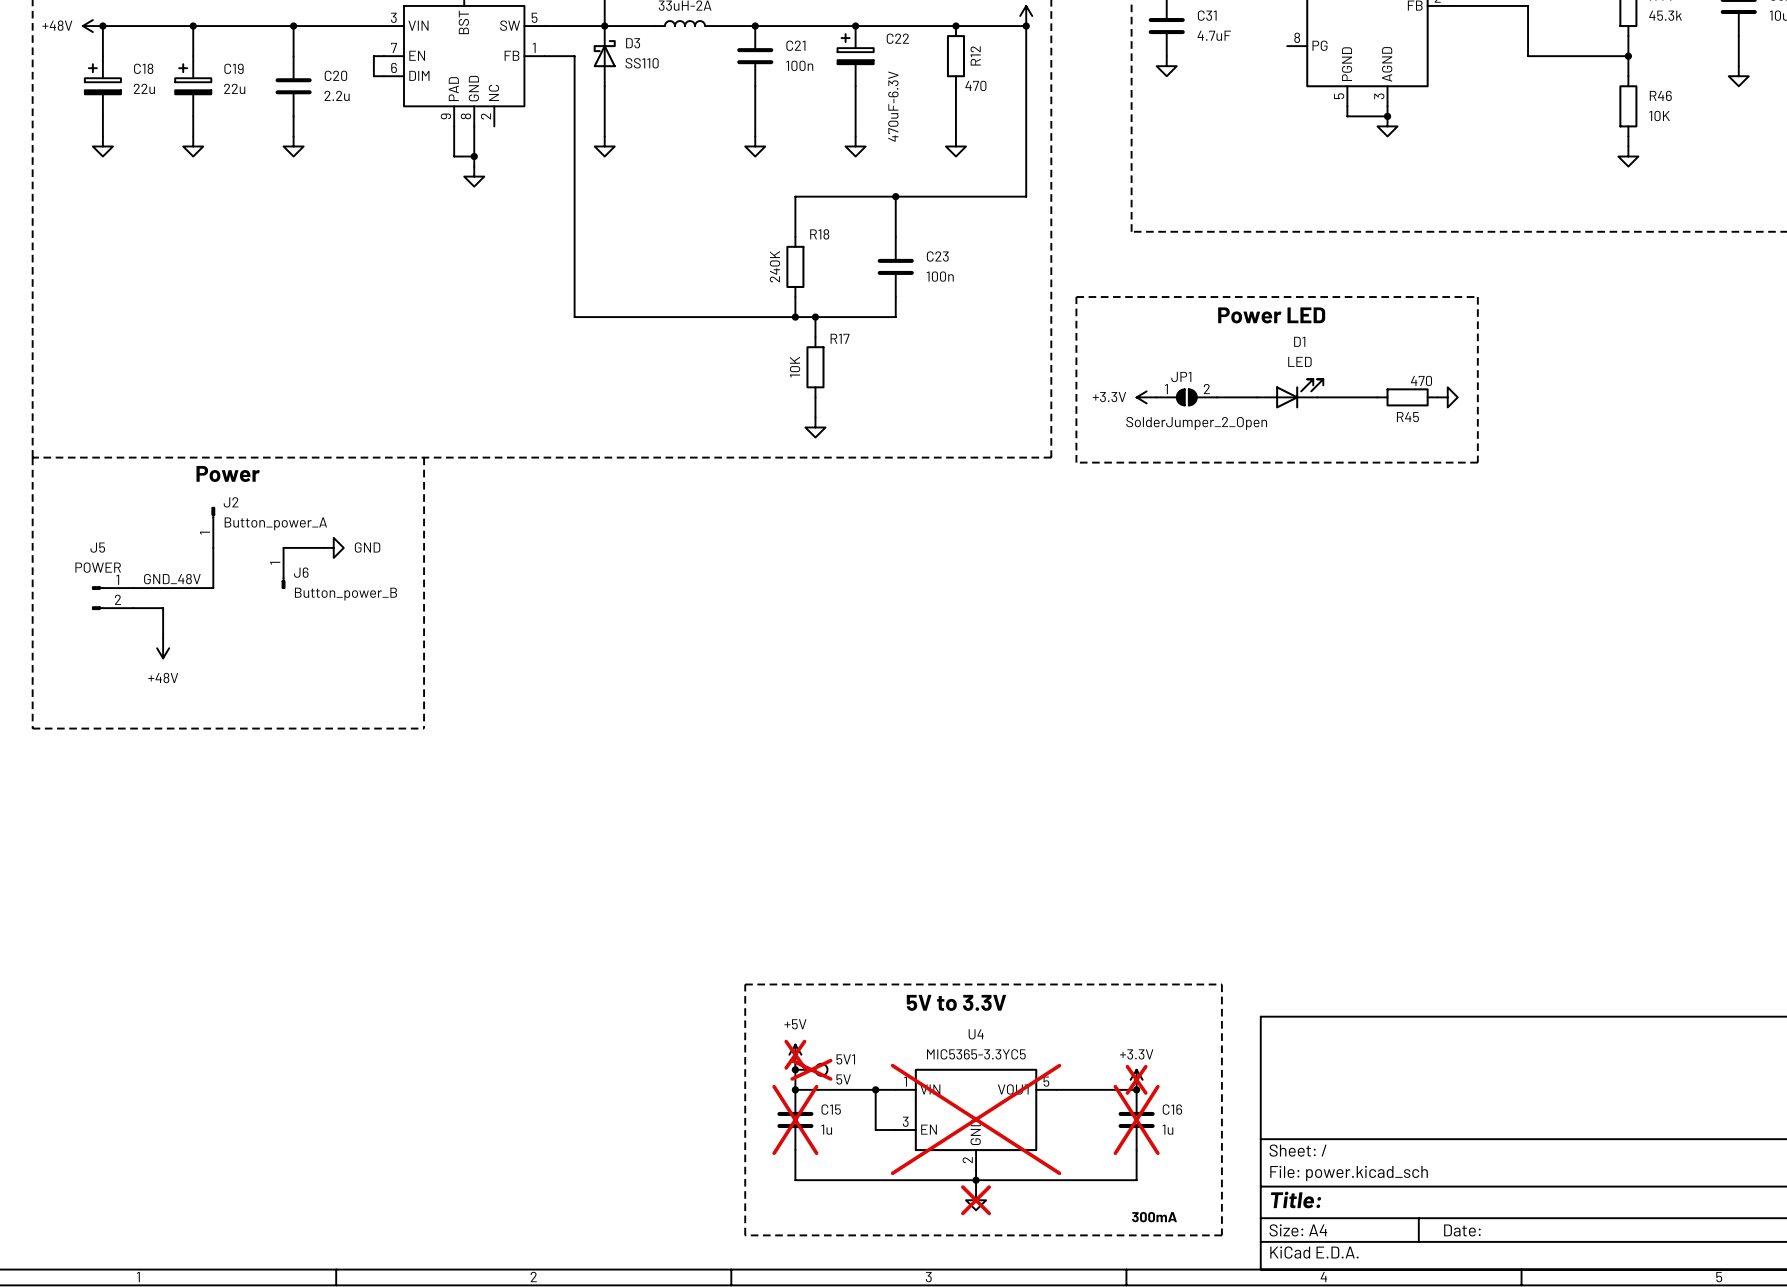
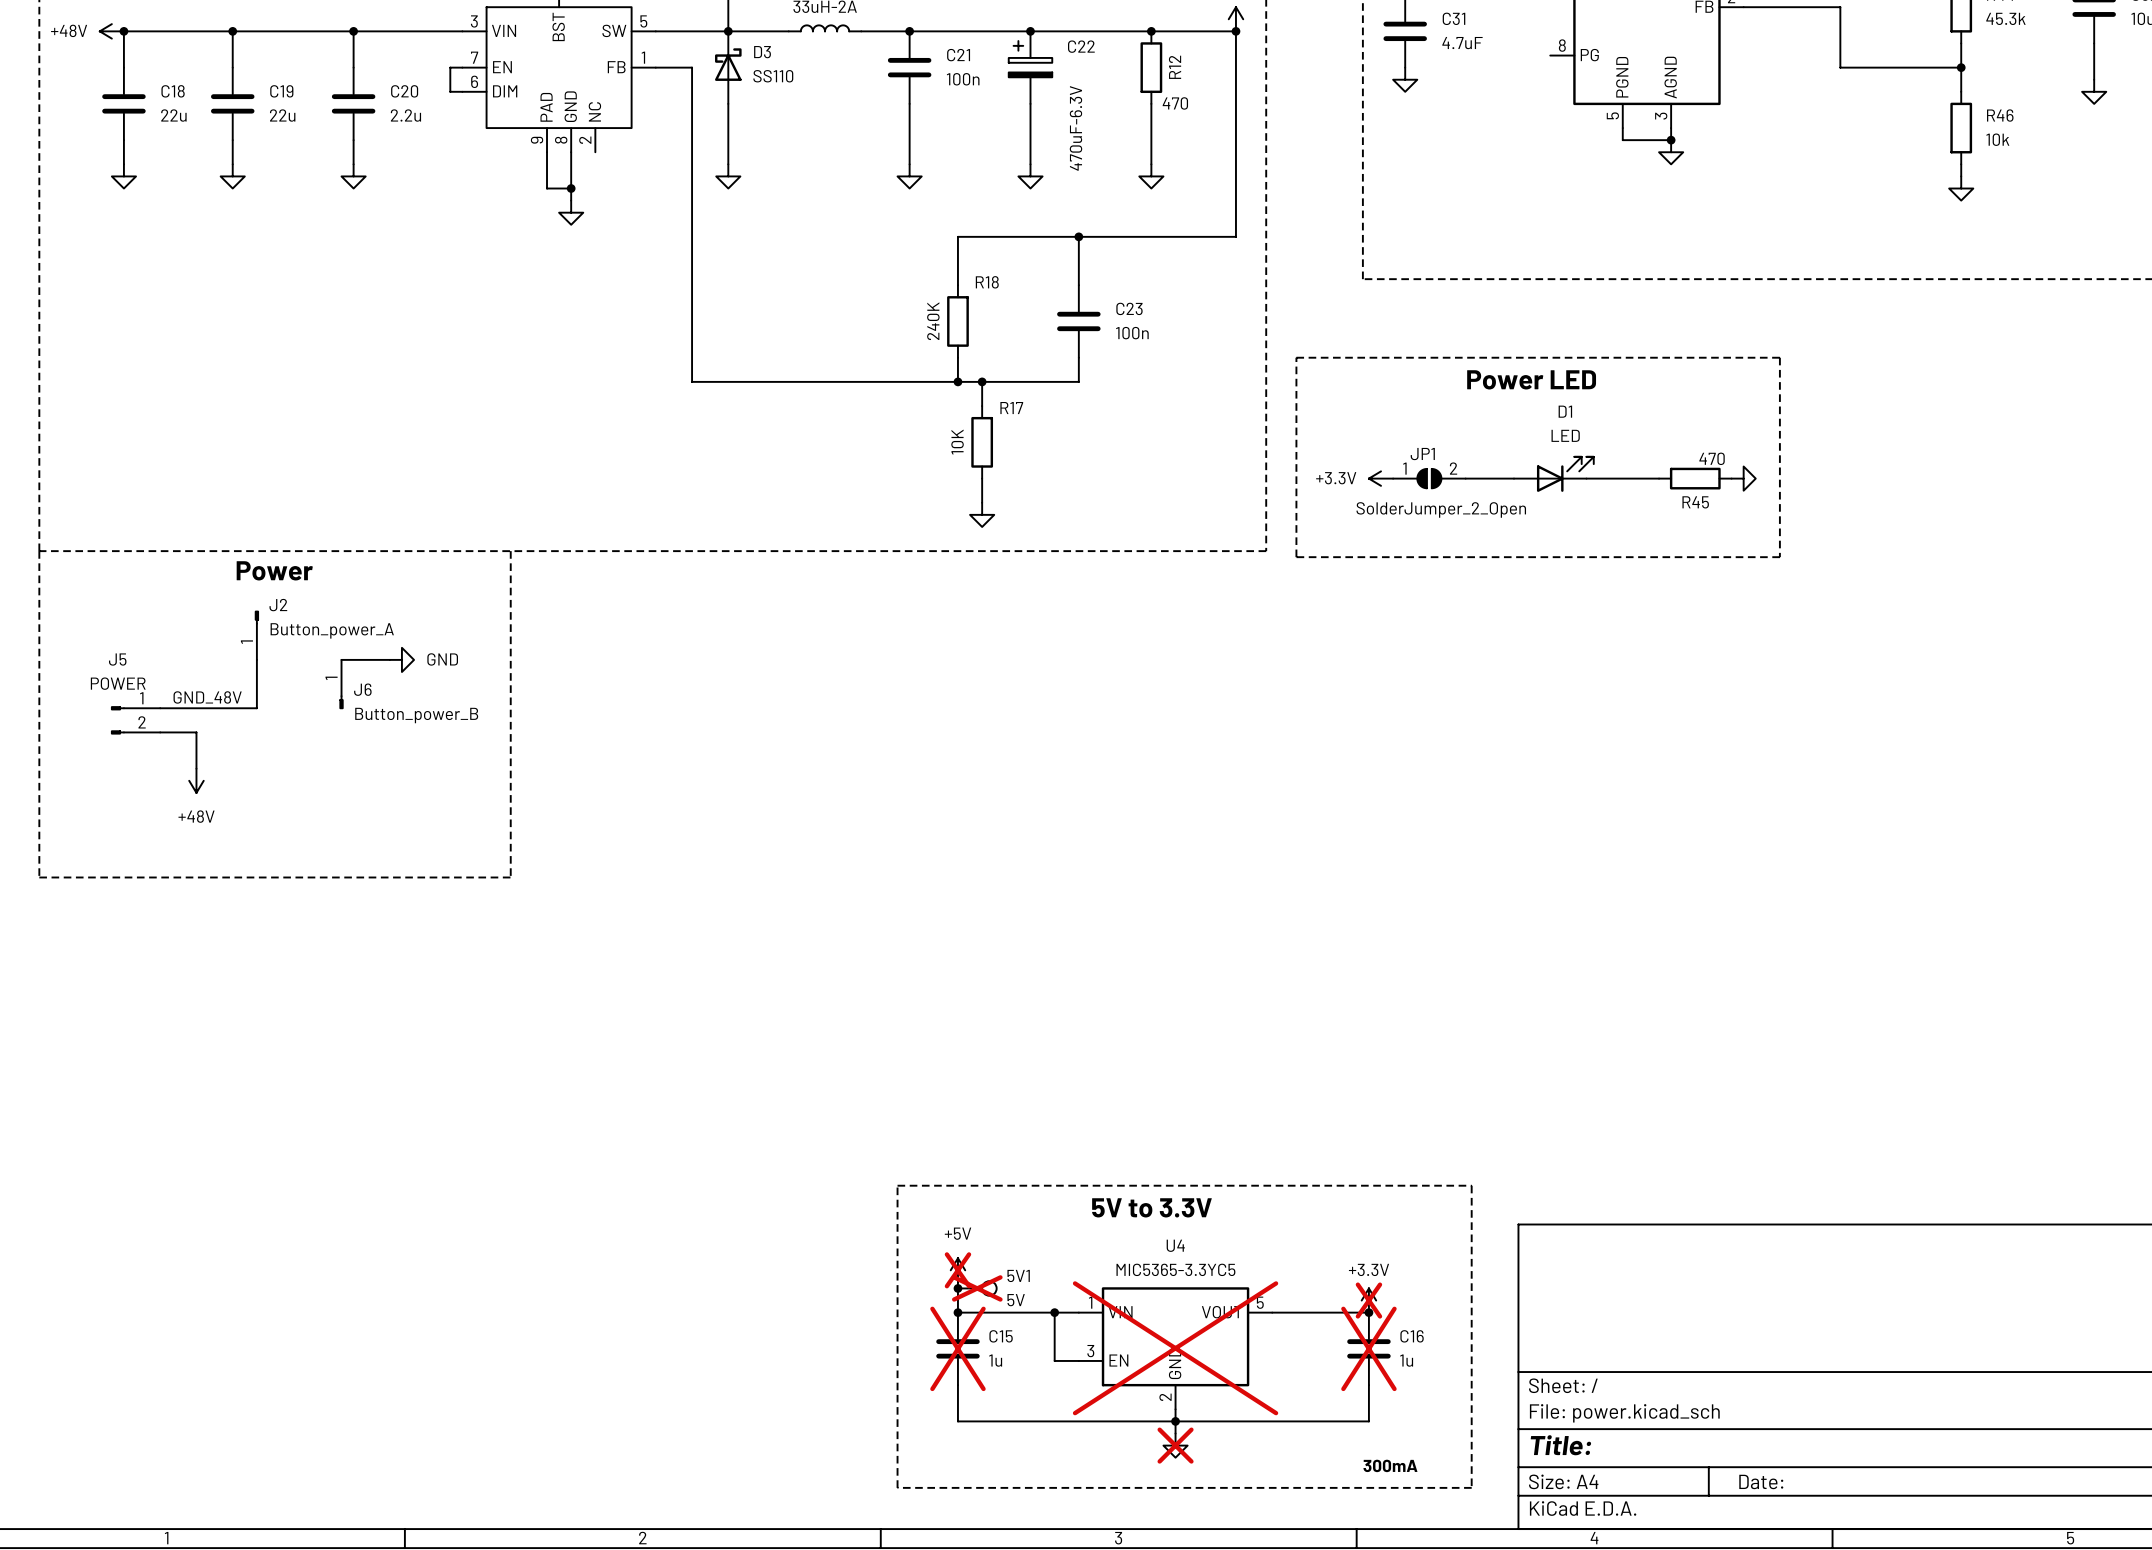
C18 symbol: [84, 56, 121, 117] -> [102, 67, 146, 141]
C19 symbol: [175, 56, 212, 117] -> [210, 67, 255, 141]
R46 value: 10K (1659, 116) -> 10k (1997, 139)

